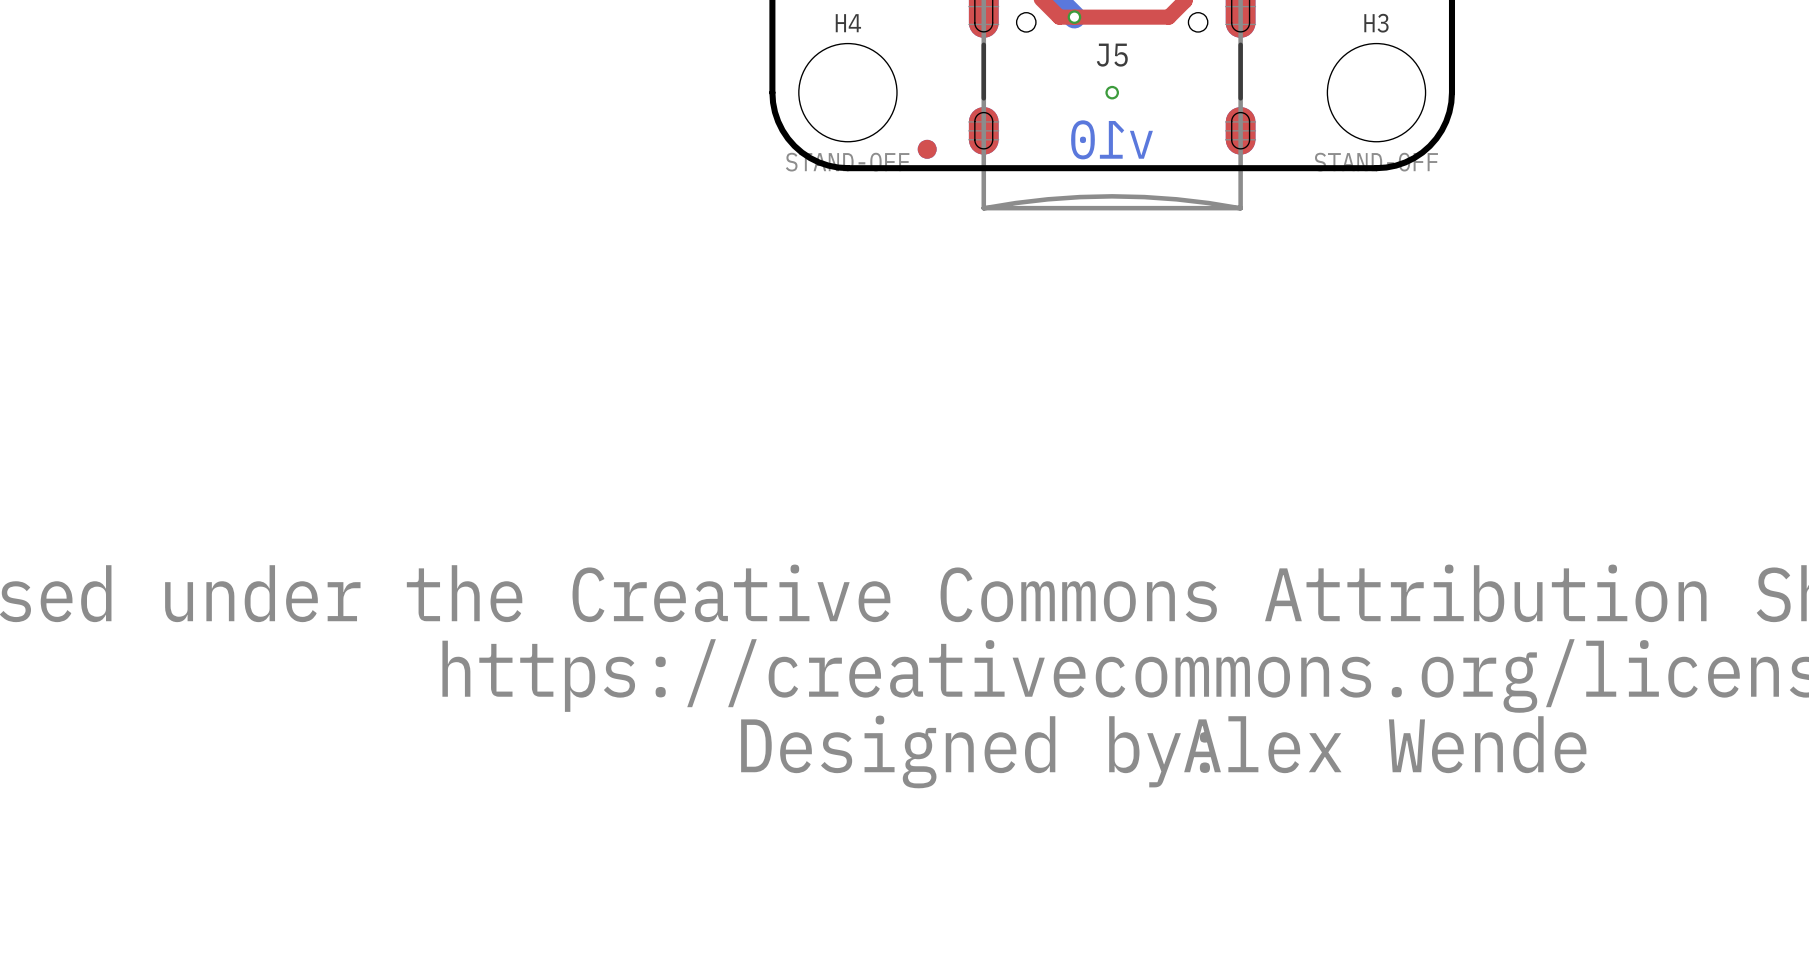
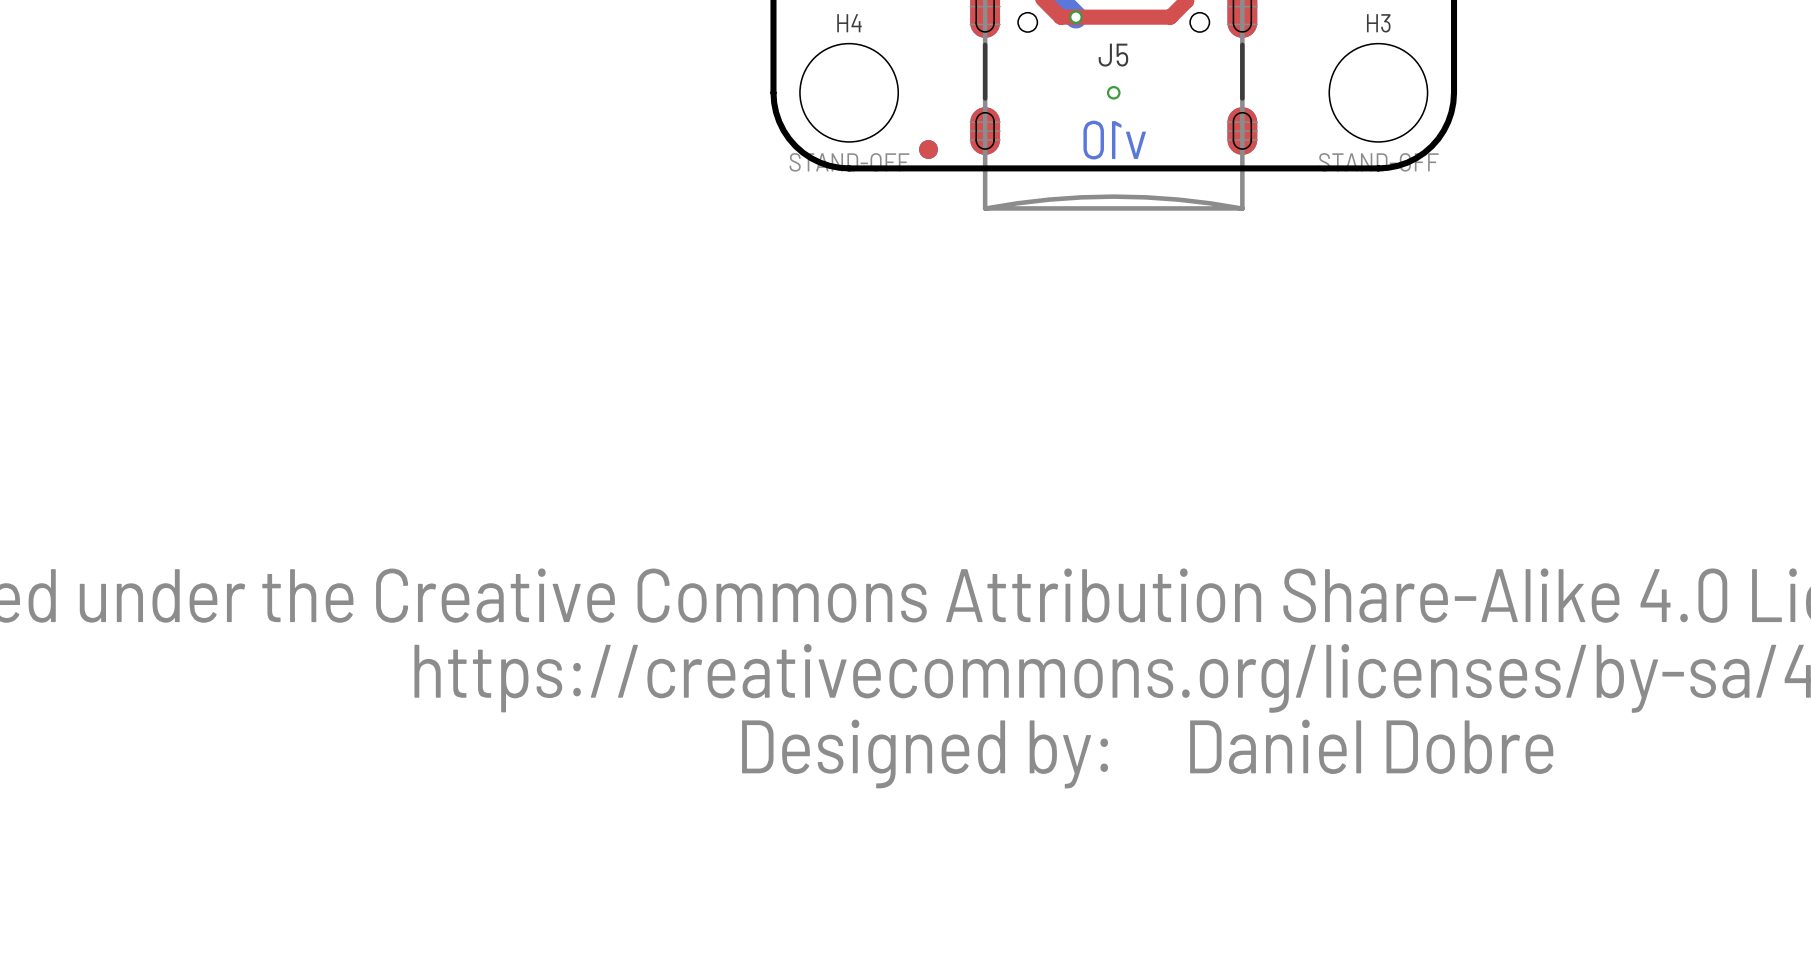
text: Alex Wende (1385, 744) -> Daniel Dobre (1371, 746)

